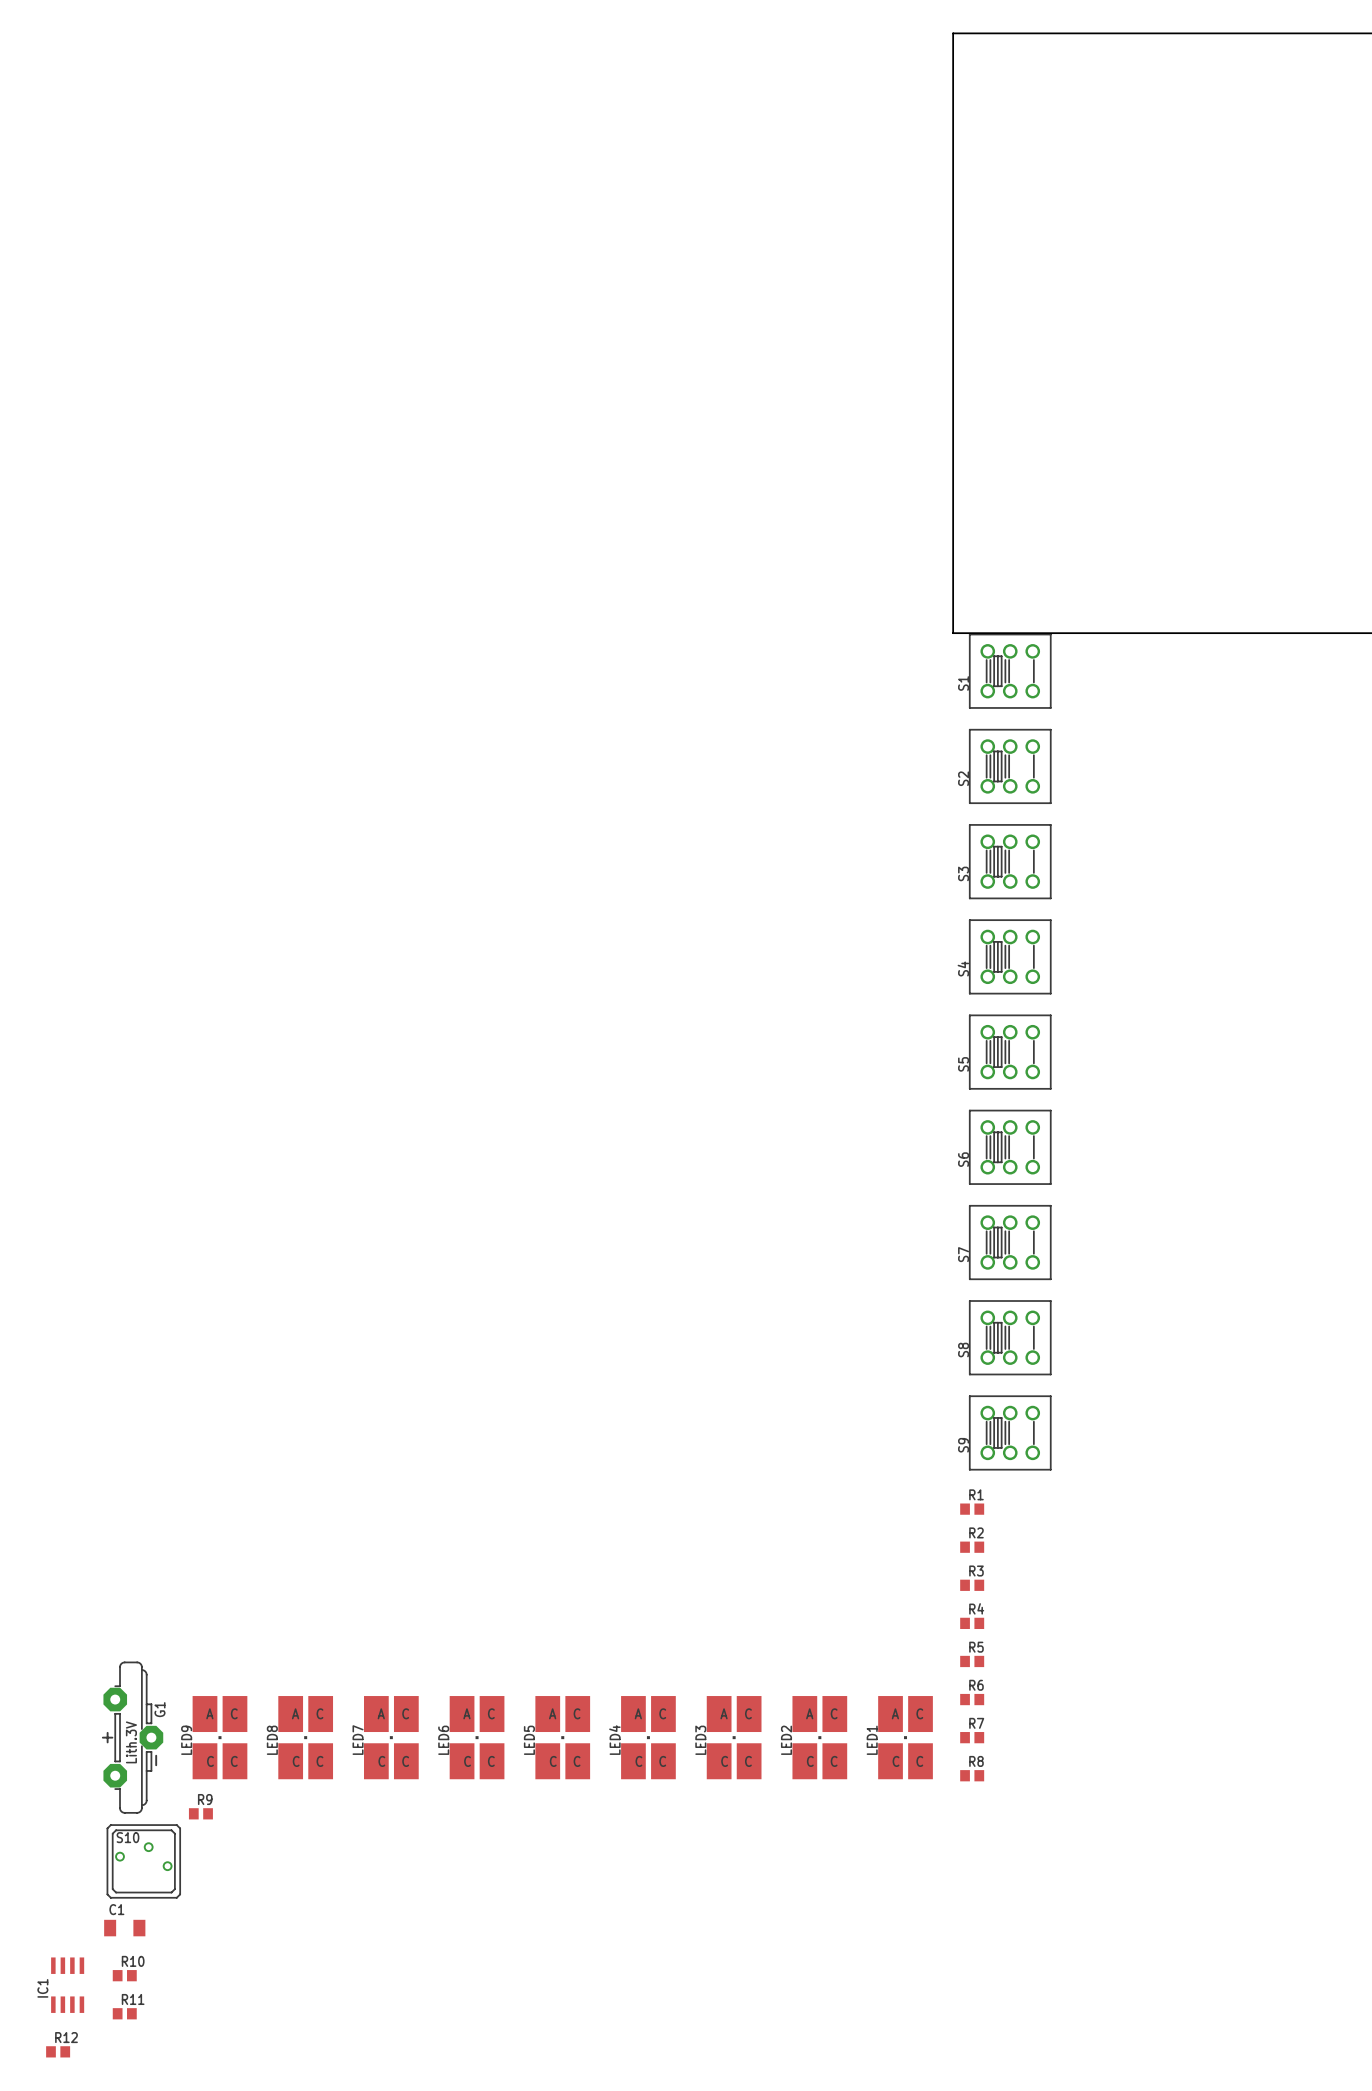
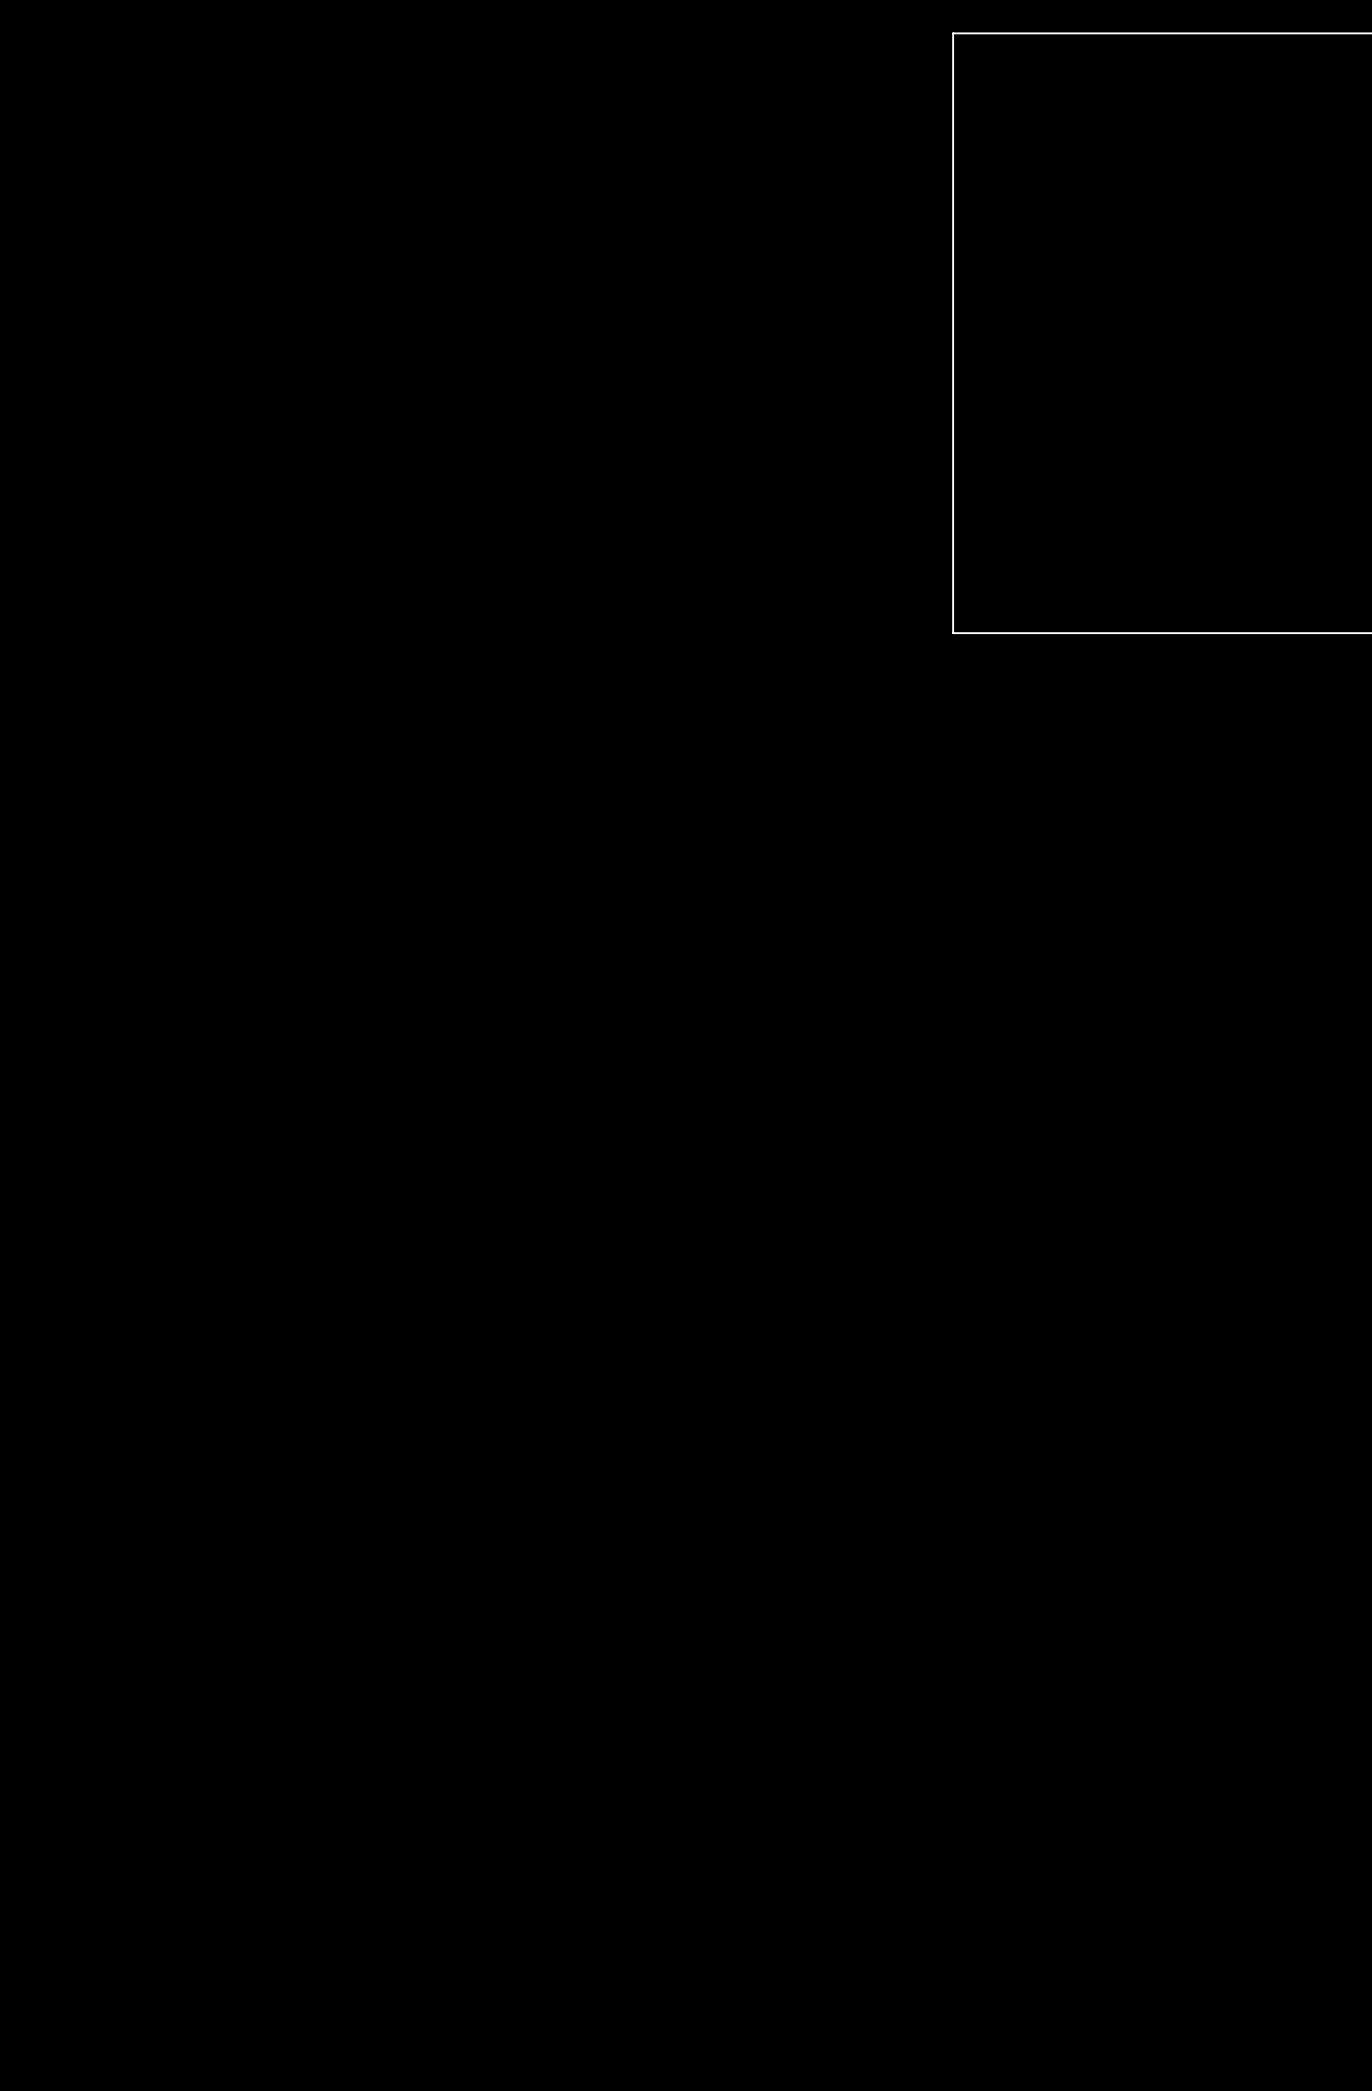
S1: (1010, 671) -> none
S2: (1010, 766) -> none
S3: (1010, 861) -> none
S4: (1010, 956) -> none
S5: (1010, 1052) -> none
S6: (1010, 1147) -> none
S7: (1010, 1242) -> none
S8: (1010, 1337) -> none
S9: (1010, 1432) -> none
R1: (972, 1509) -> none
R2: (972, 1547) -> none
R3: (972, 1585) -> none
R4: (972, 1623) -> none
R5: (972, 1661) -> none
R6: (972, 1699) -> none
G1: (132, 1737) -> none
LED9: (219, 1737) -> none
LED8: (305, 1737) -> none
LED7: (391, 1737) -> none
LED6: (477, 1737) -> none
LED5: (562, 1737) -> none
LED4: (648, 1737) -> none
LED3: (734, 1737) -> none
LED2: (819, 1737) -> none
LED1: (905, 1737) -> none
R7: (972, 1737) -> none
R8: (972, 1775) -> none
R9: (200, 1813) -> none
S10: (143, 1861) -> none
C1: (124, 1928) -> none
R10: (124, 1975) -> none
IC1: (67, 1985) -> none
R11: (124, 2013) -> none
R12: (58, 2051) -> none

